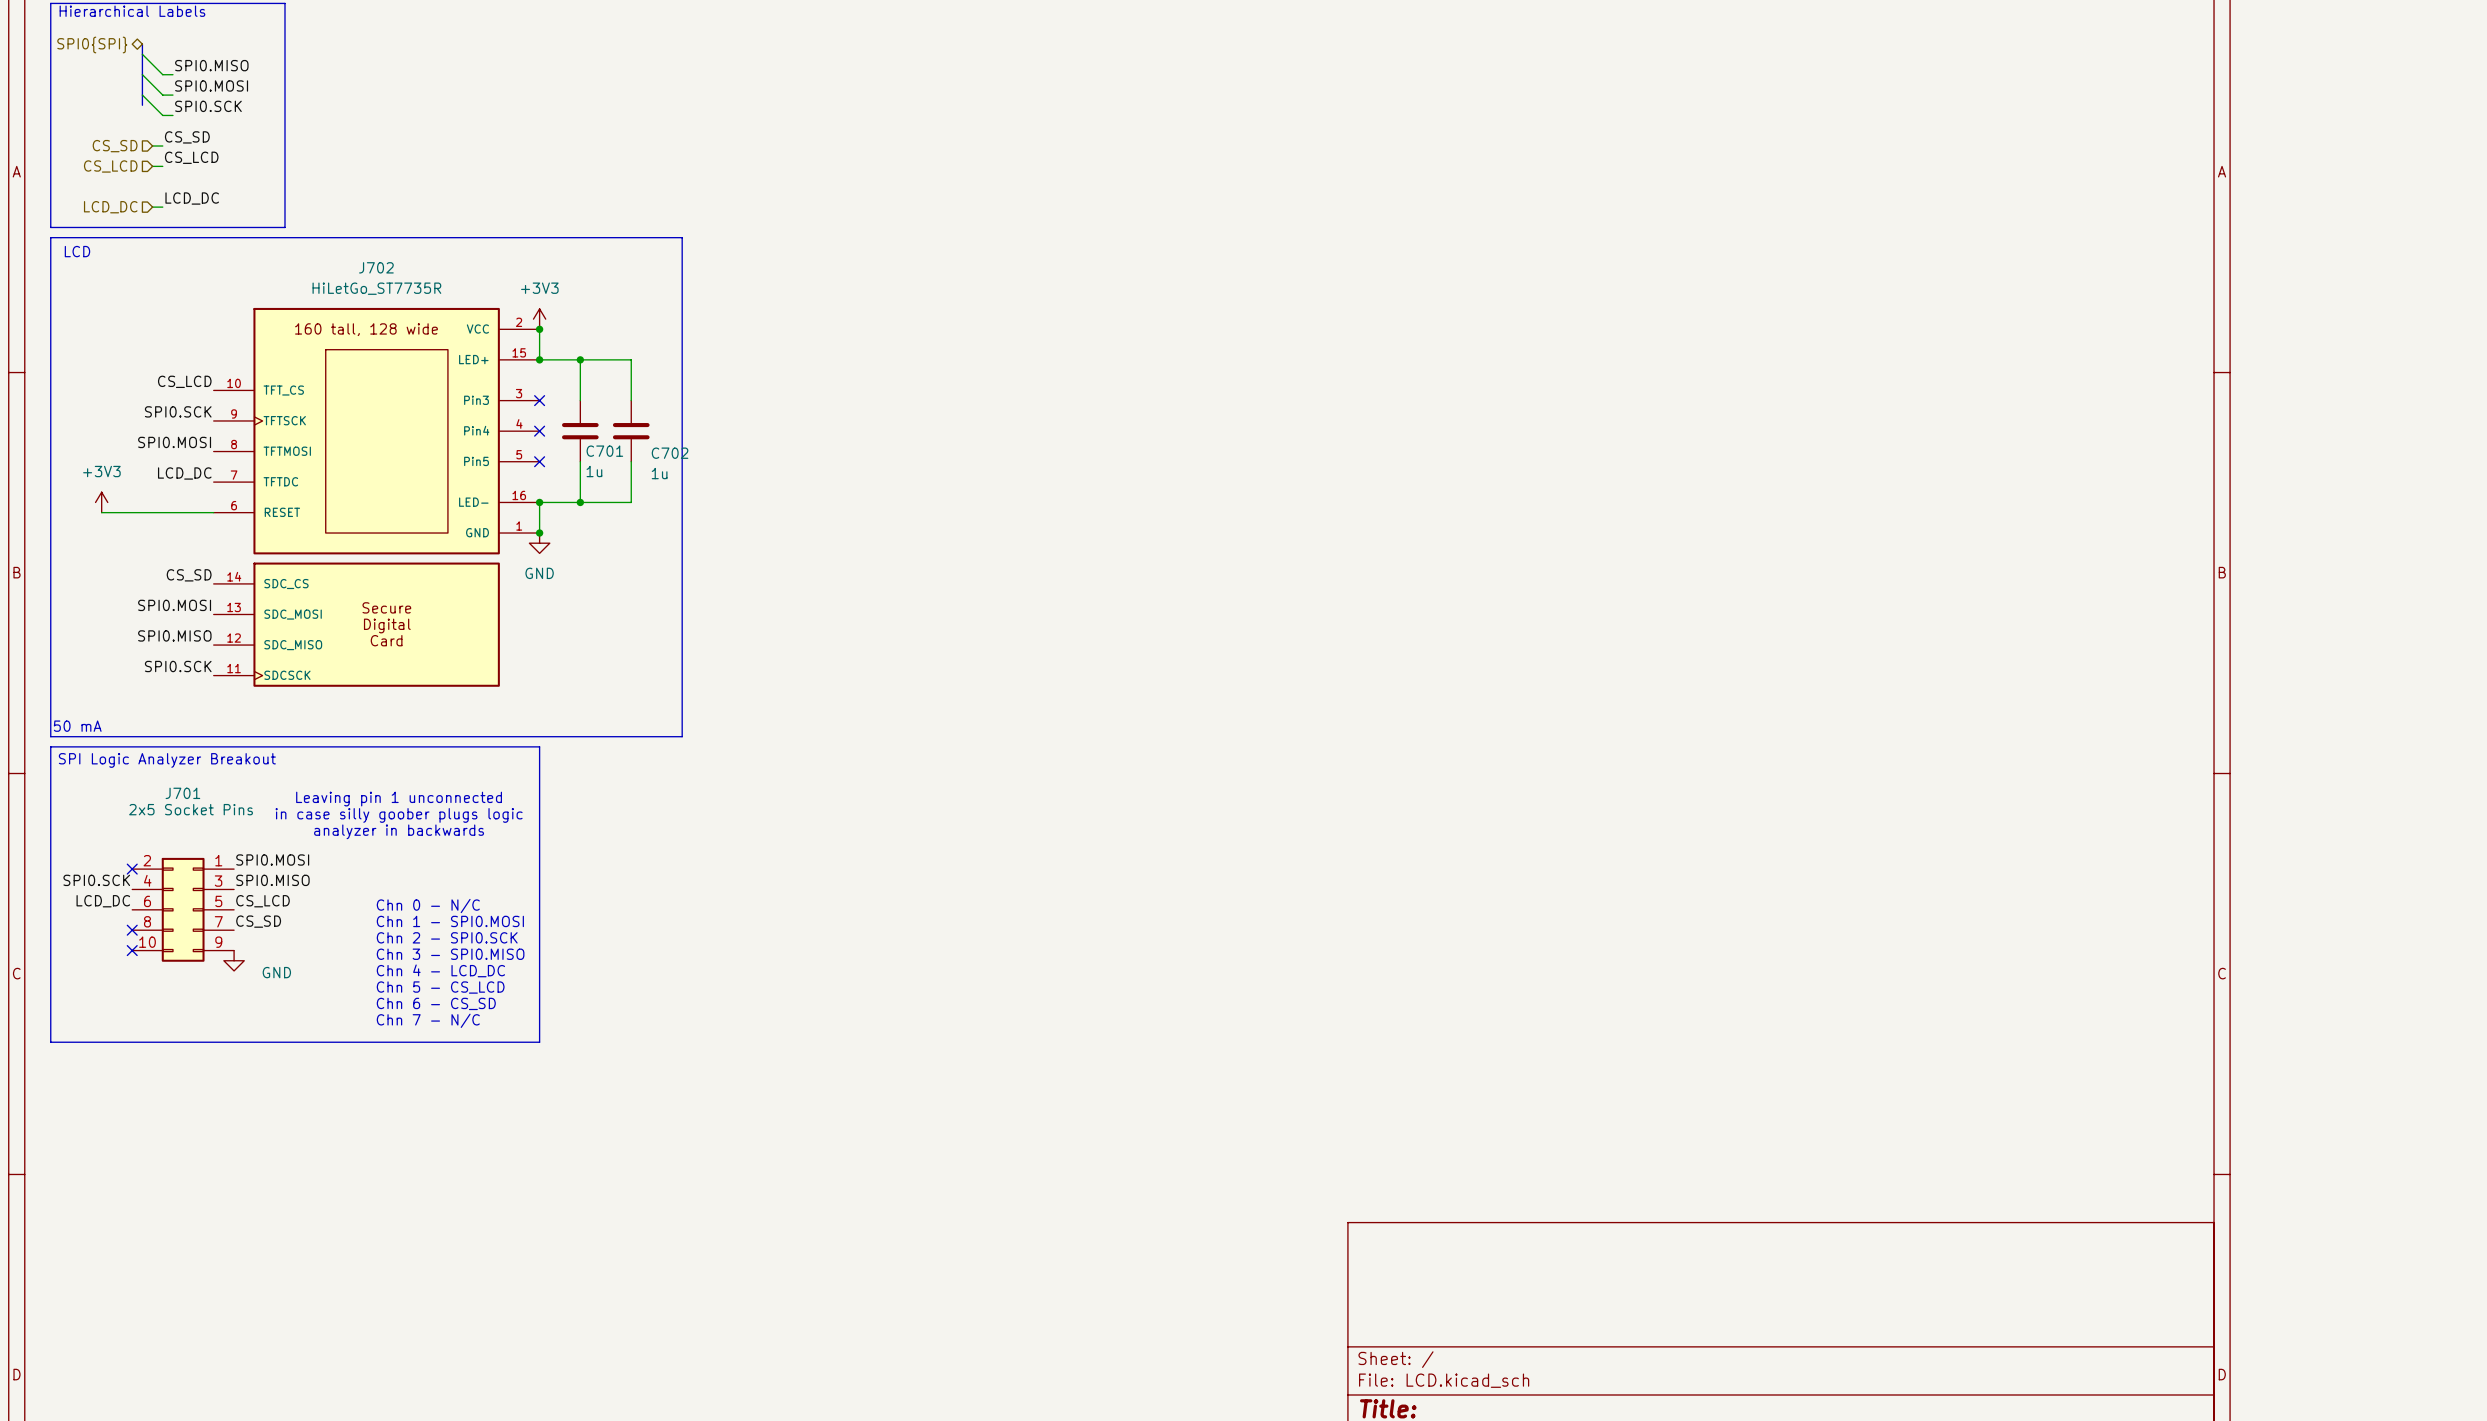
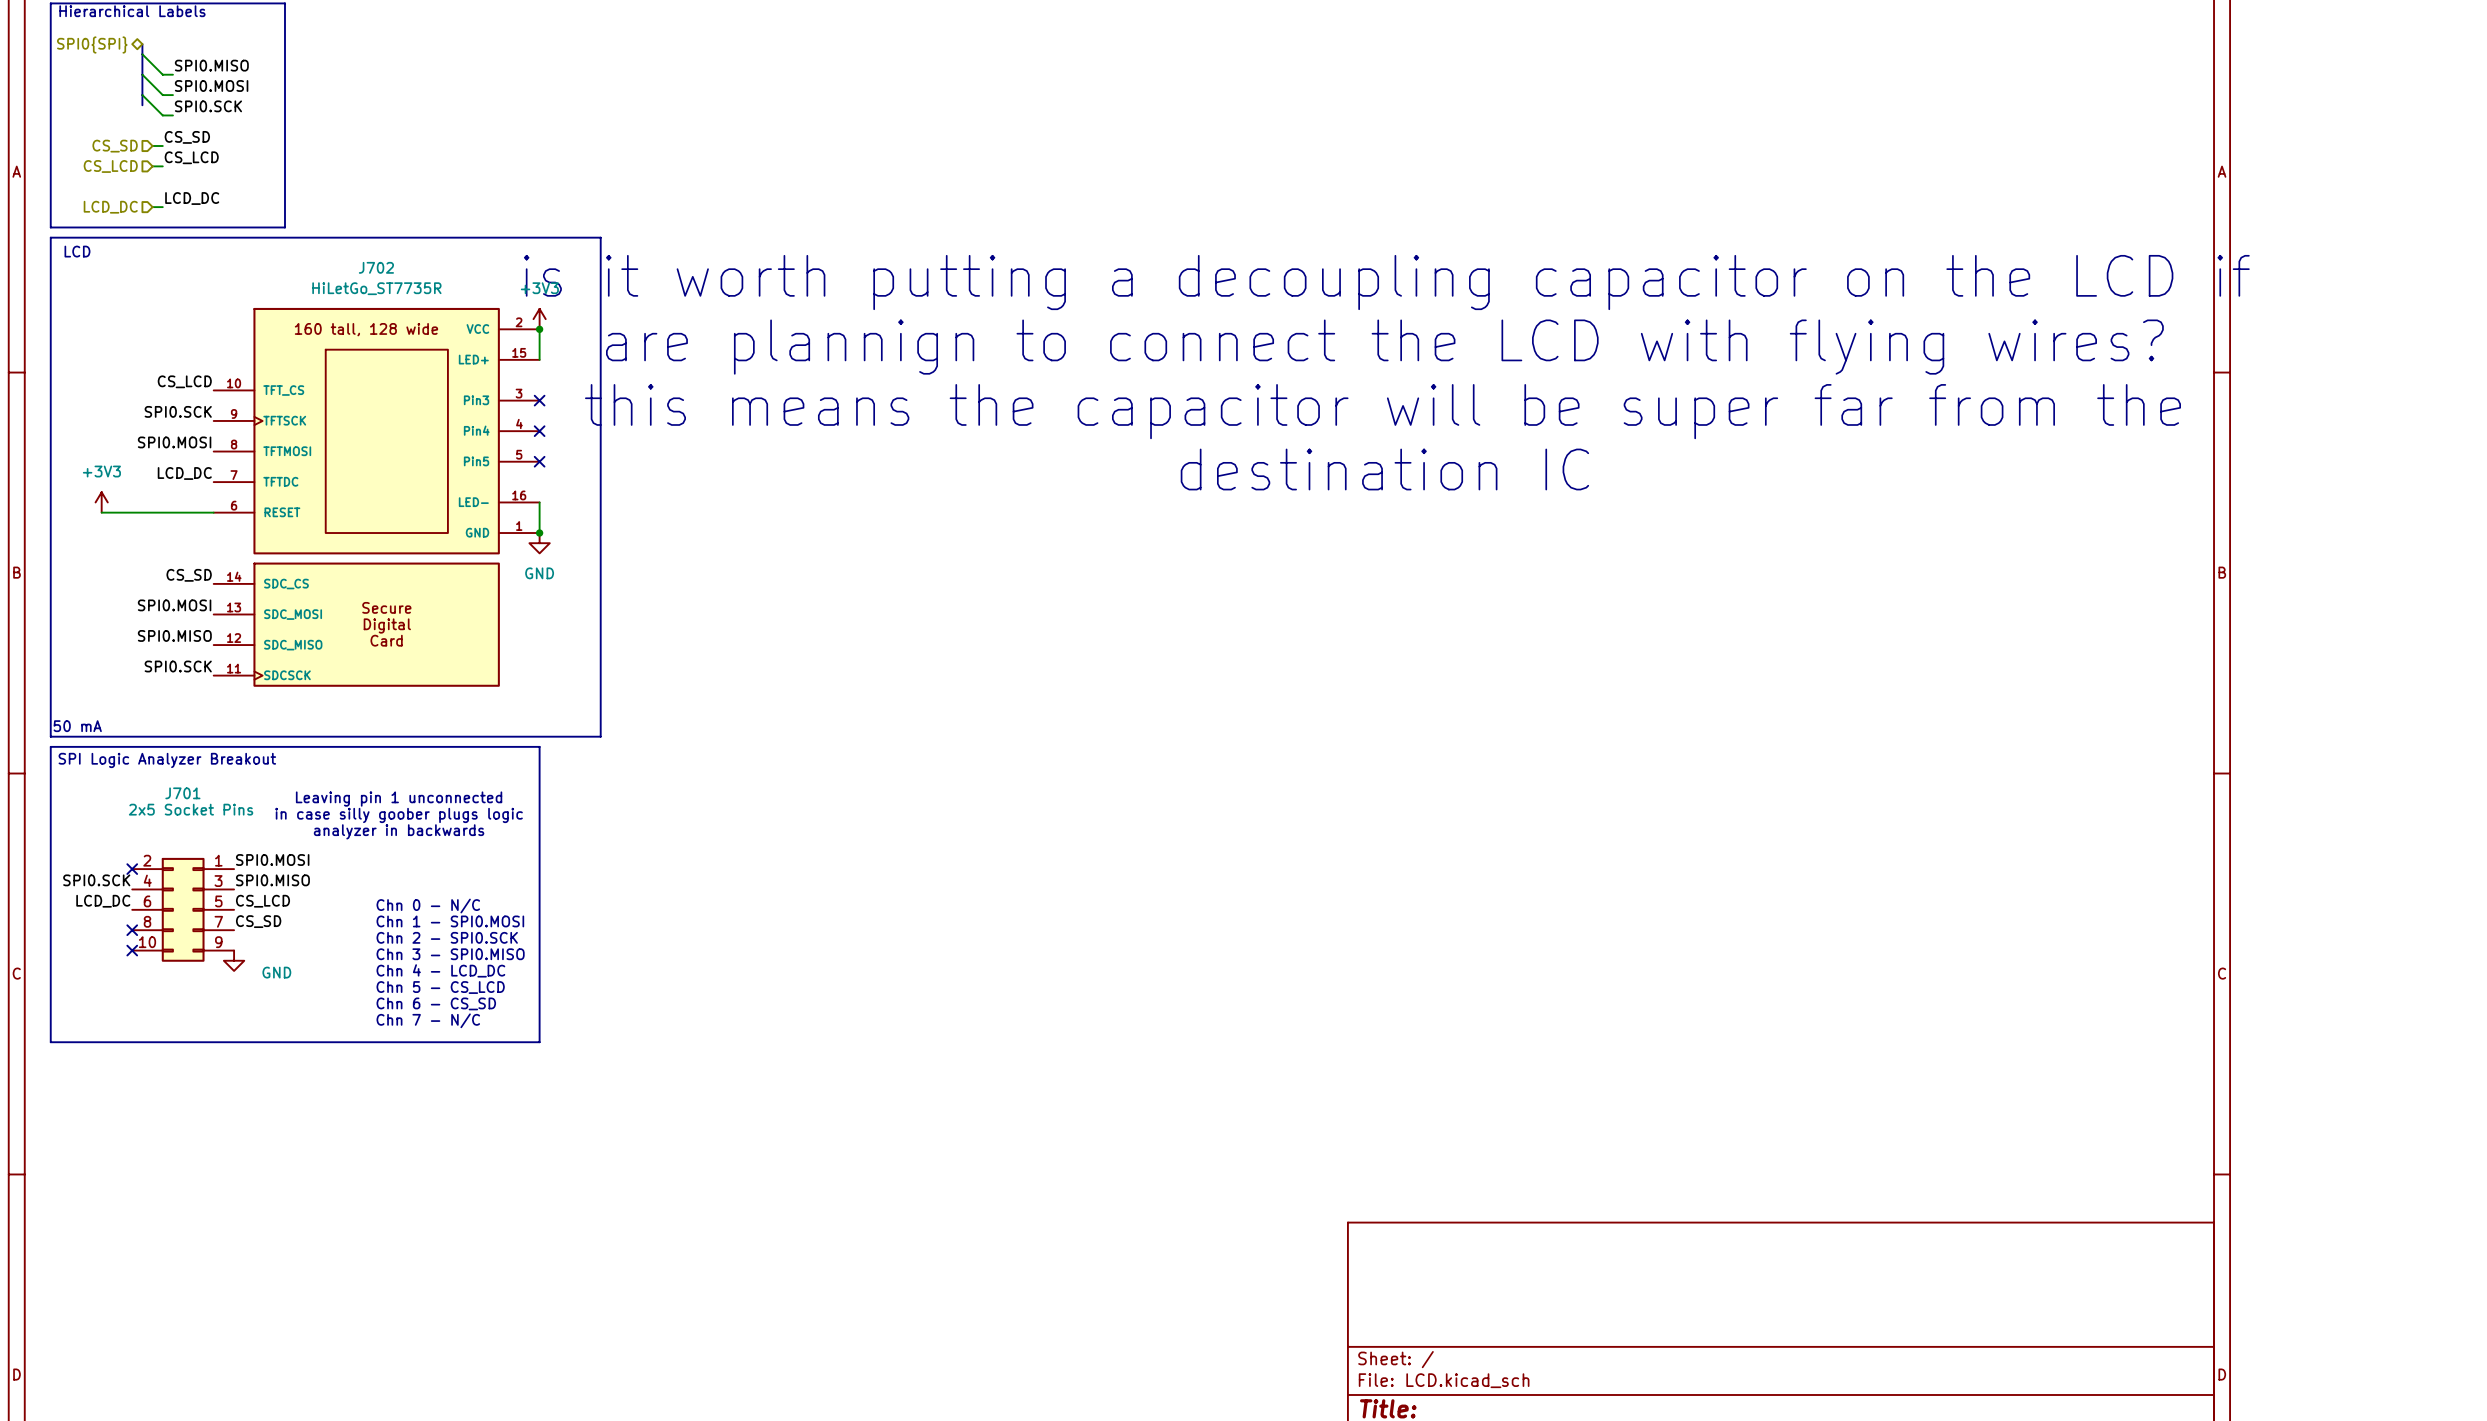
line: (600, 237) (682, 237) (682, 736) (600, 736) -> (600, 237) (600, 736)
text: none -> is it worth putting a decoupling capacitor on the LCD if (1386, 282)
text: none -> are plannign to connect the LCD with flying wires? (1384, 347)
wire: (539, 359) (631, 359) (631, 400) -> none
junction: (539, 359) -> none
wire: (580, 359) (580, 400) -> none
junction: (580, 359) -> none
text: none -> this means the capacitor will be super far from the (1383, 411)
C701: 1u (580, 431) -> none
C702: 1u (631, 431) -> none
wire: (580, 461) (580, 502) -> none
wire: (631, 461) (631, 502) (539, 502) -> none
text: none -> destination IC (1384, 469)
junction: (539, 502) -> none
junction: (580, 502) -> none

